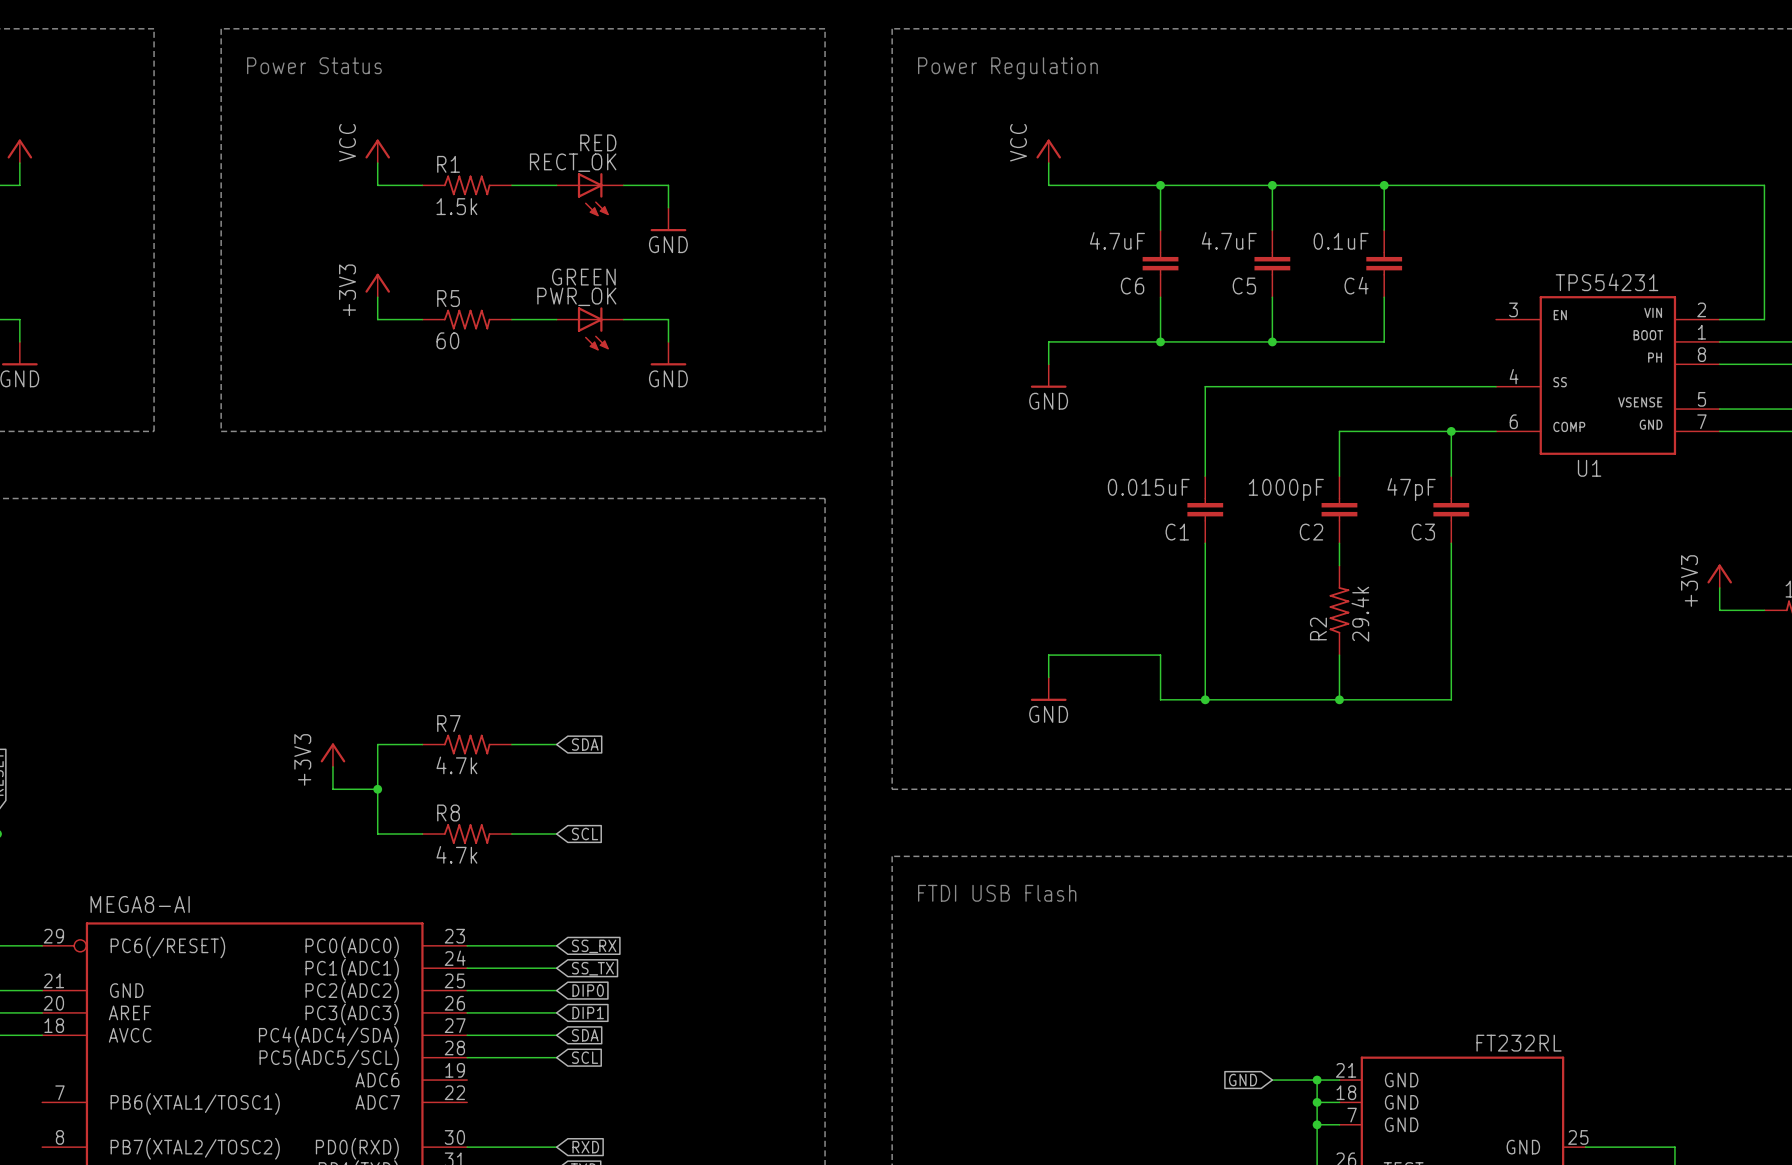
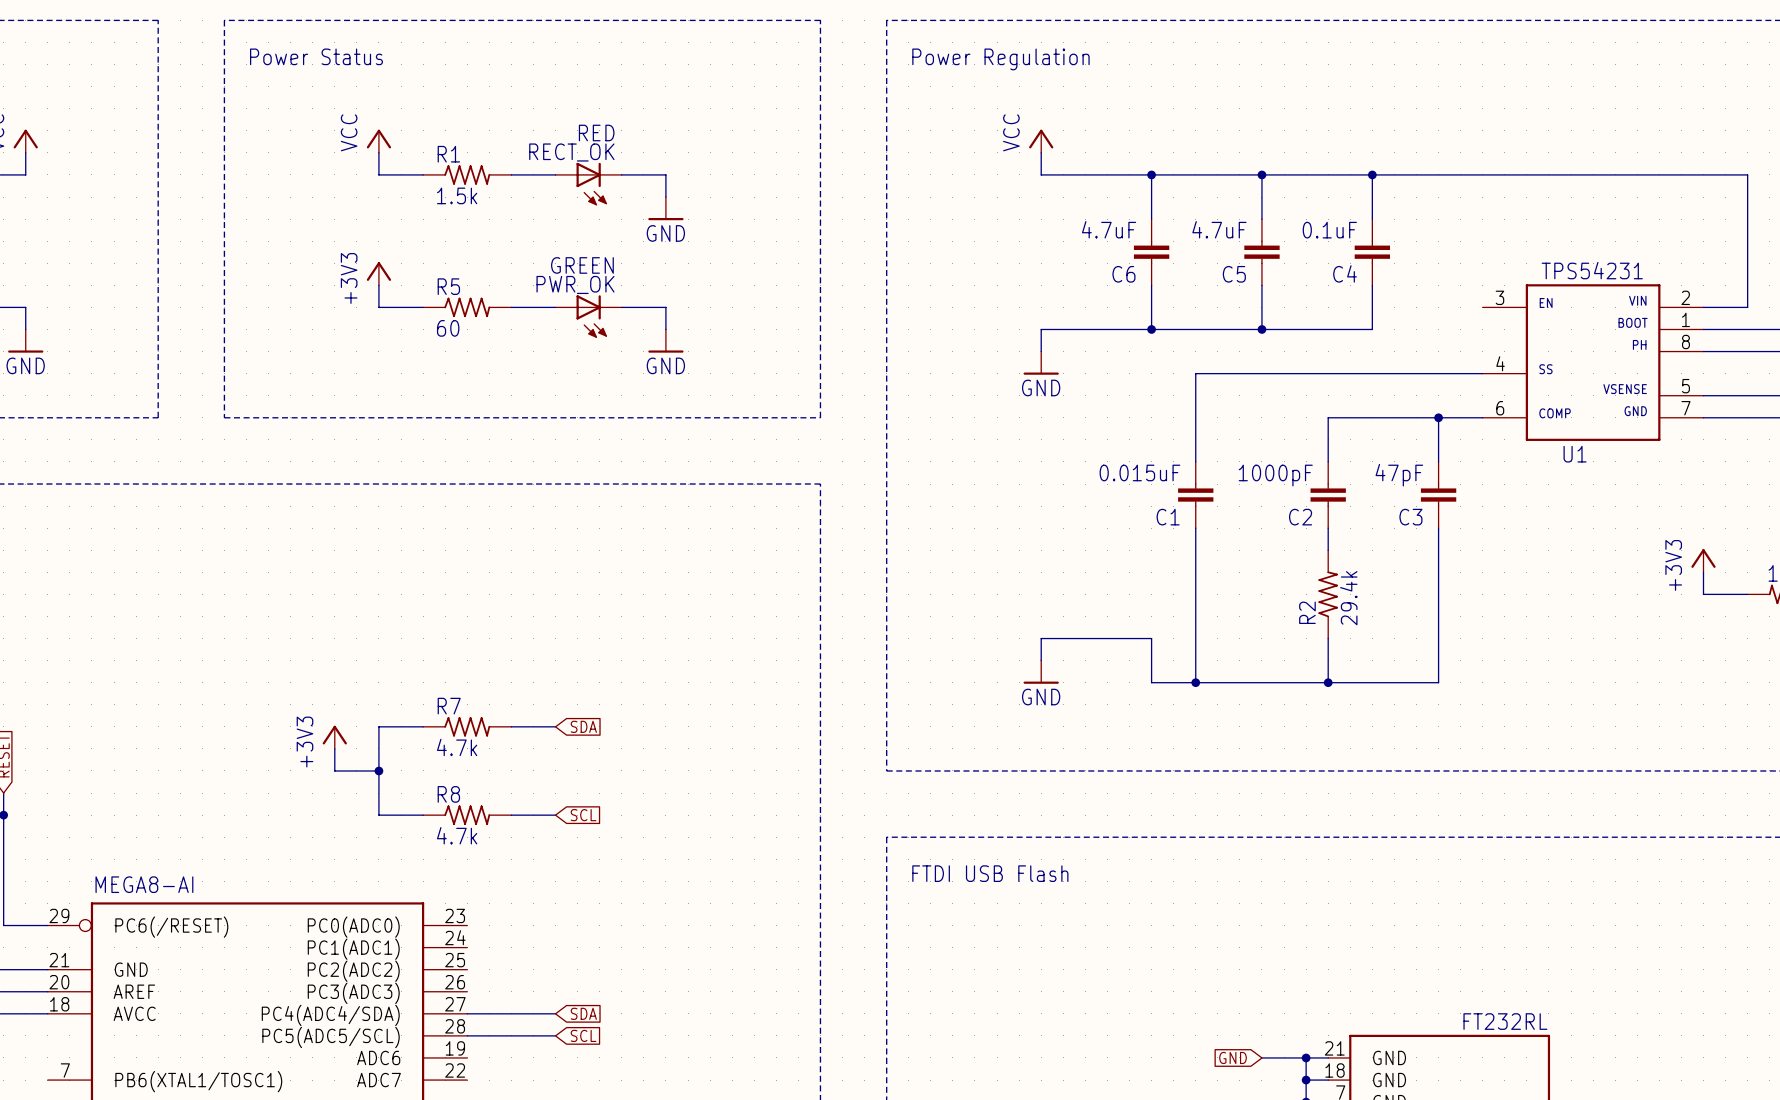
wire: (467, 945) (556, 945) -> none
global label: SS_RX (594, 946) -> none
wire: (467, 968) (556, 968) -> none
global label: SS_TX (592, 968) -> none
wire: (467, 990) (556, 990) -> none
global label: DIP0 (588, 990) -> none
wire: (467, 1012) (556, 1012) -> none
global label: DIP1 (588, 1012) -> none

